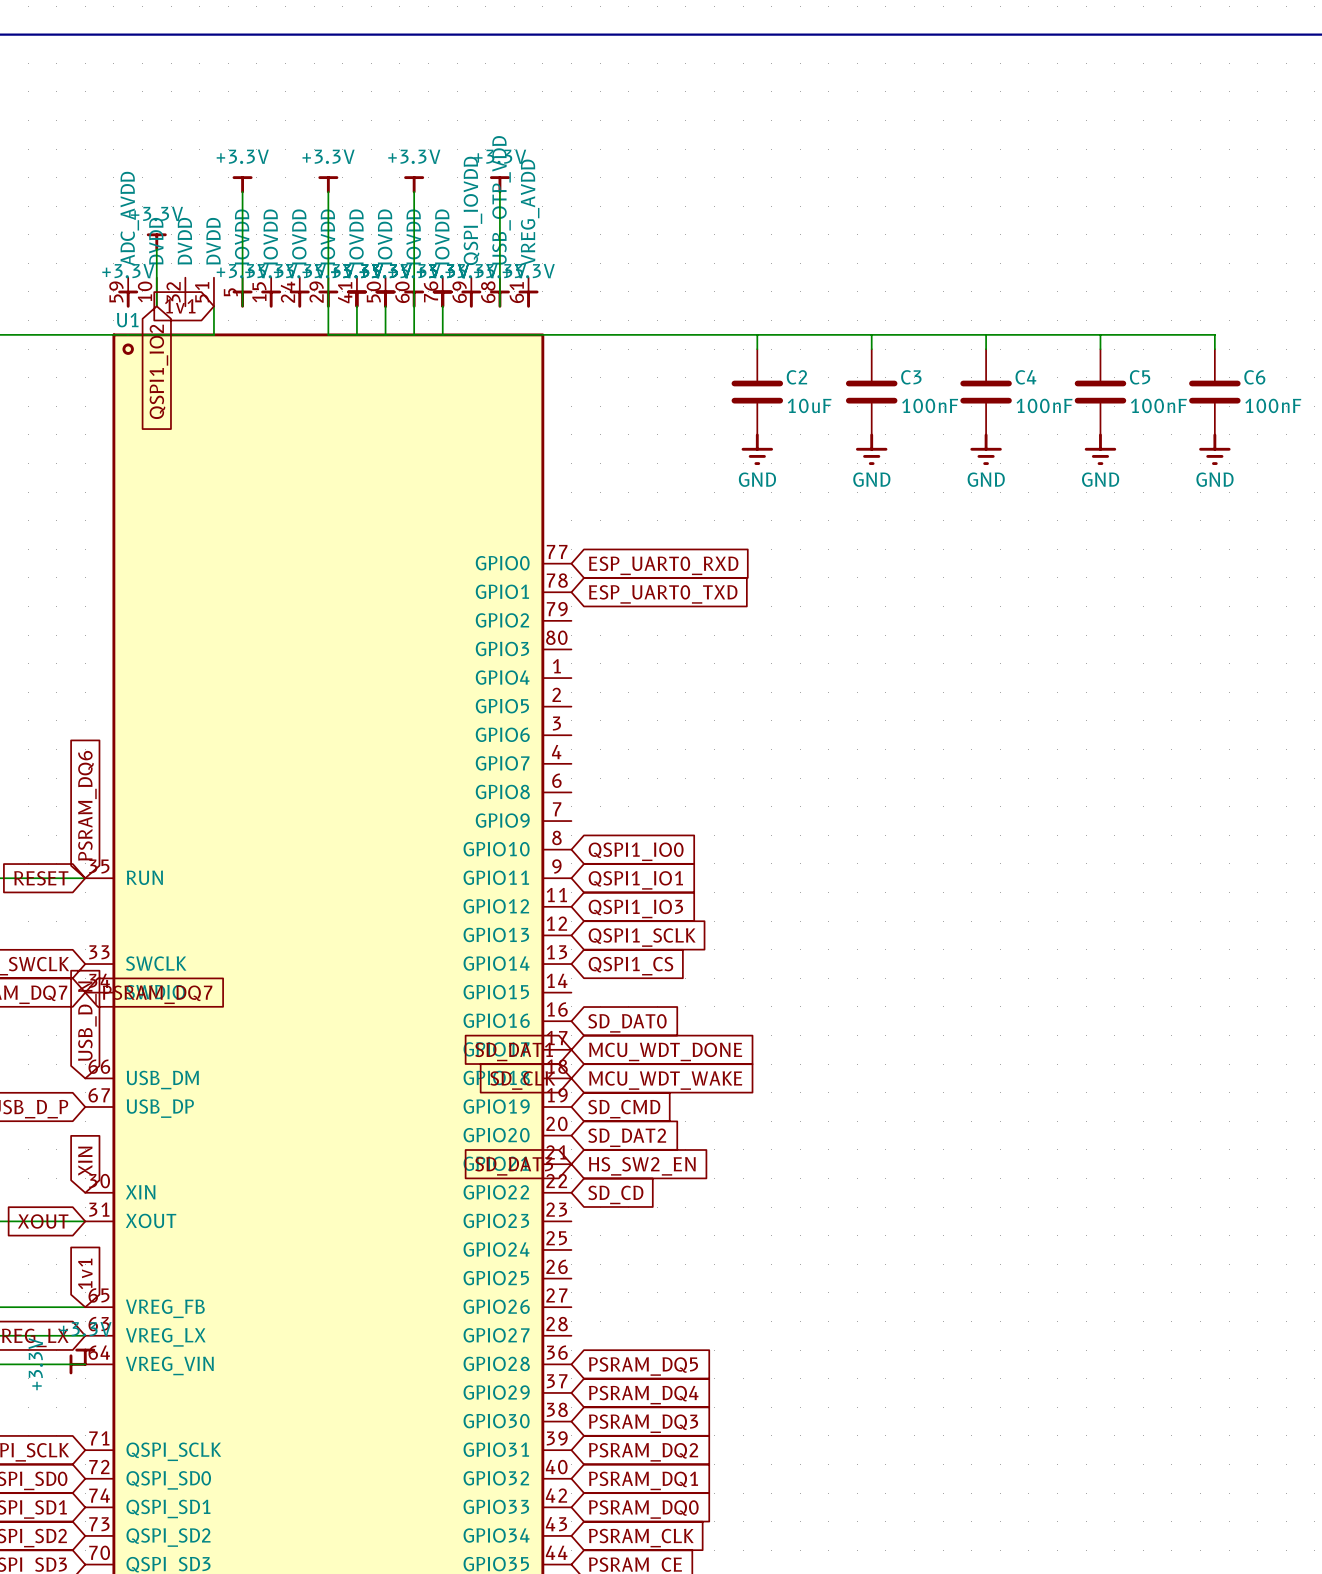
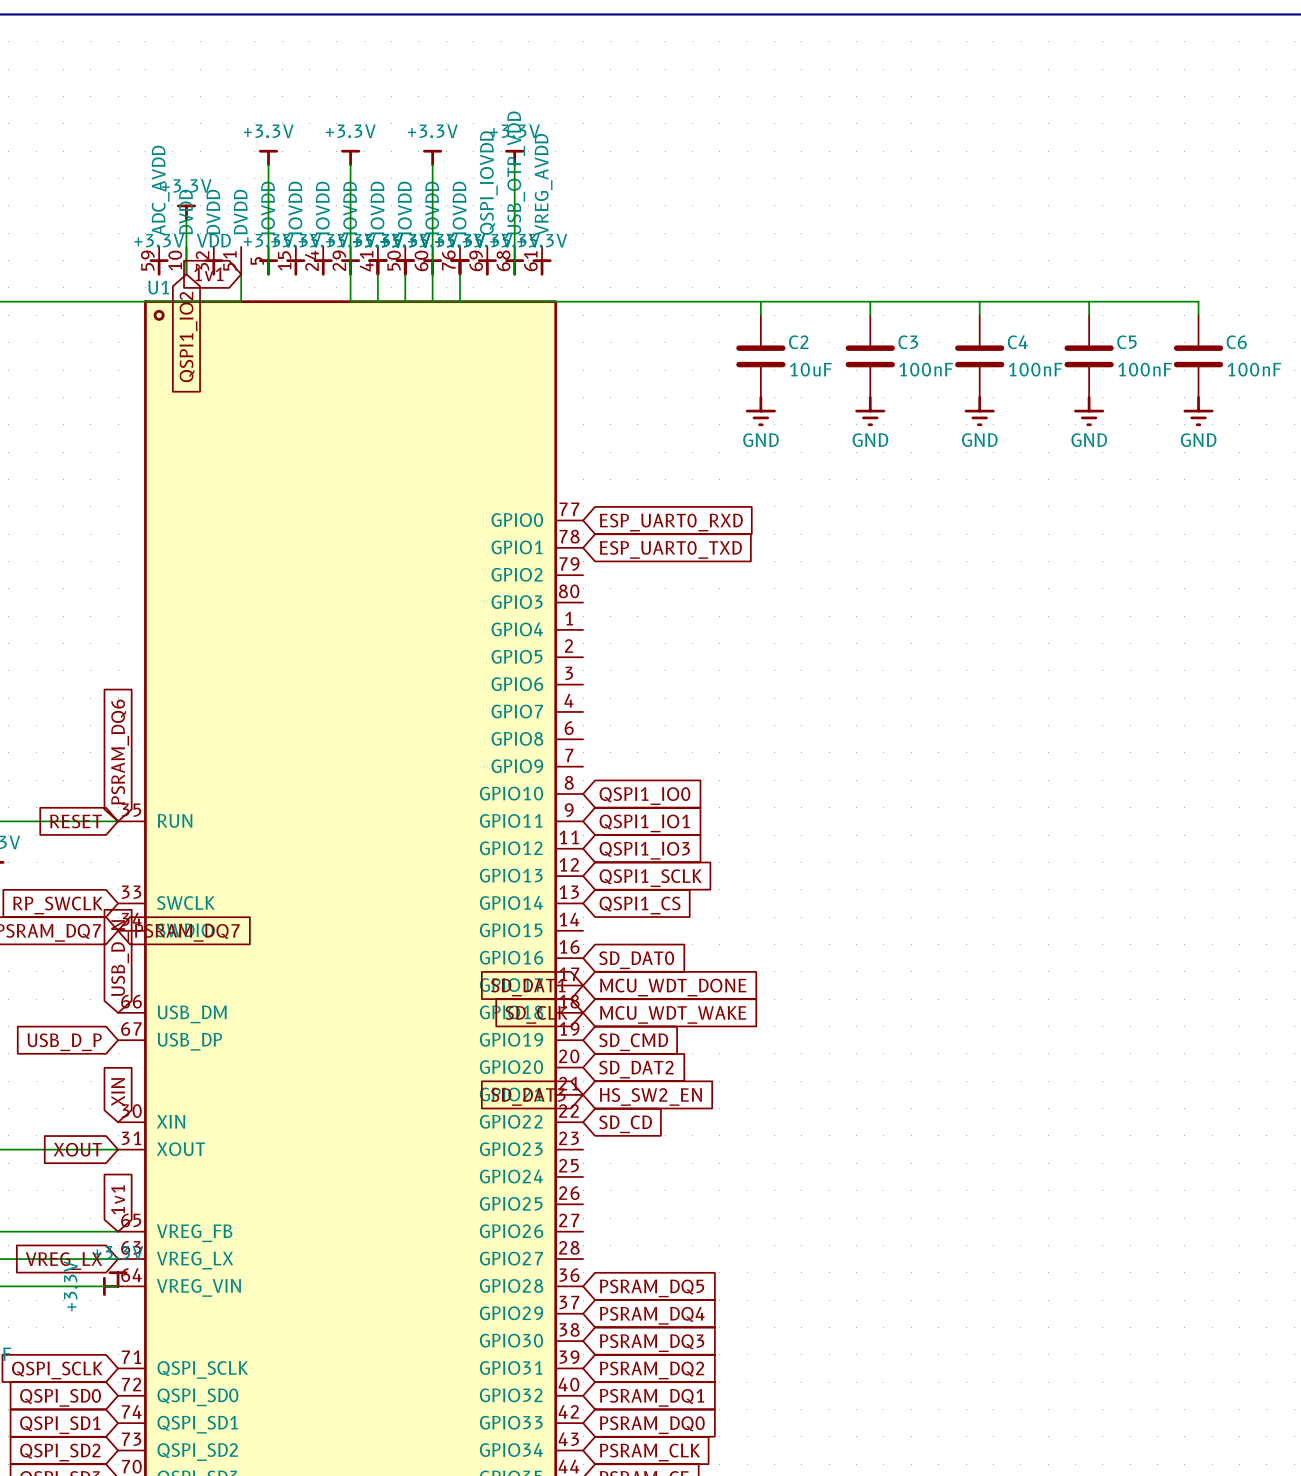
power symbol: none -> VDD (213, 267)

